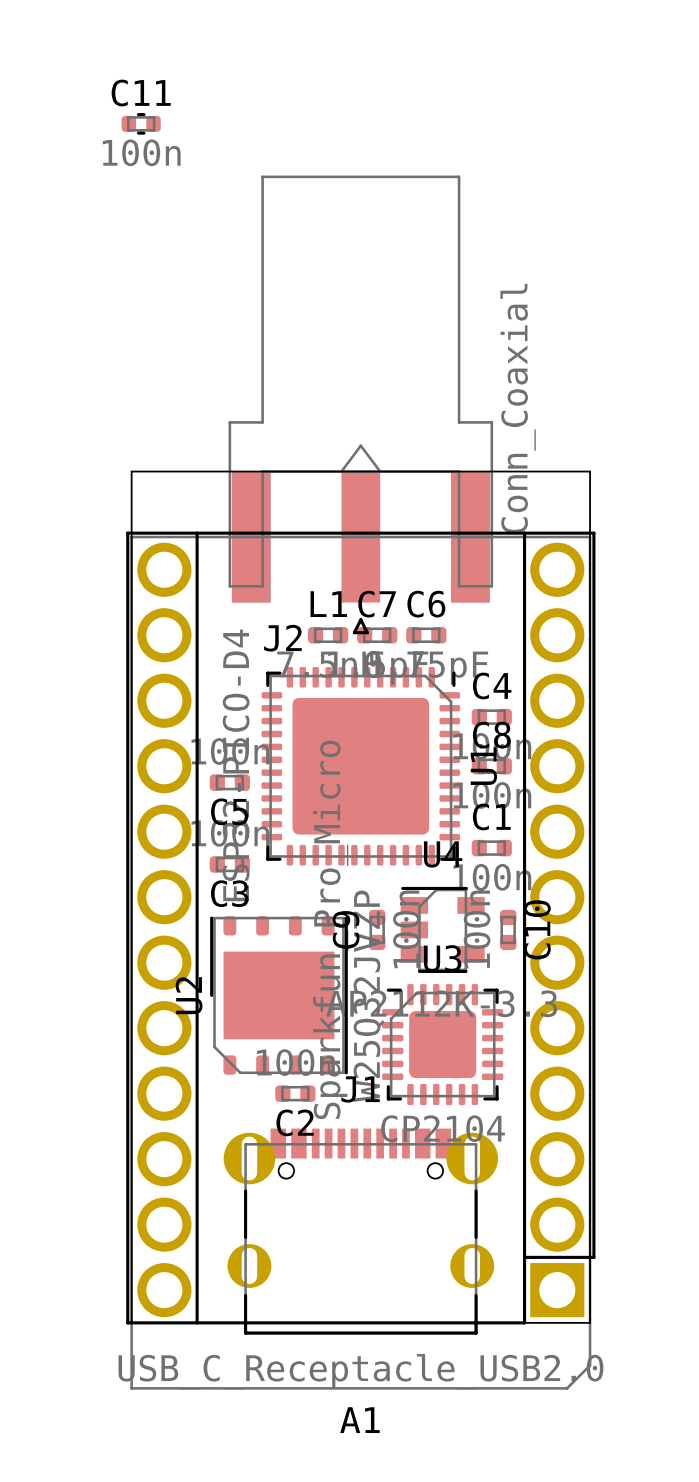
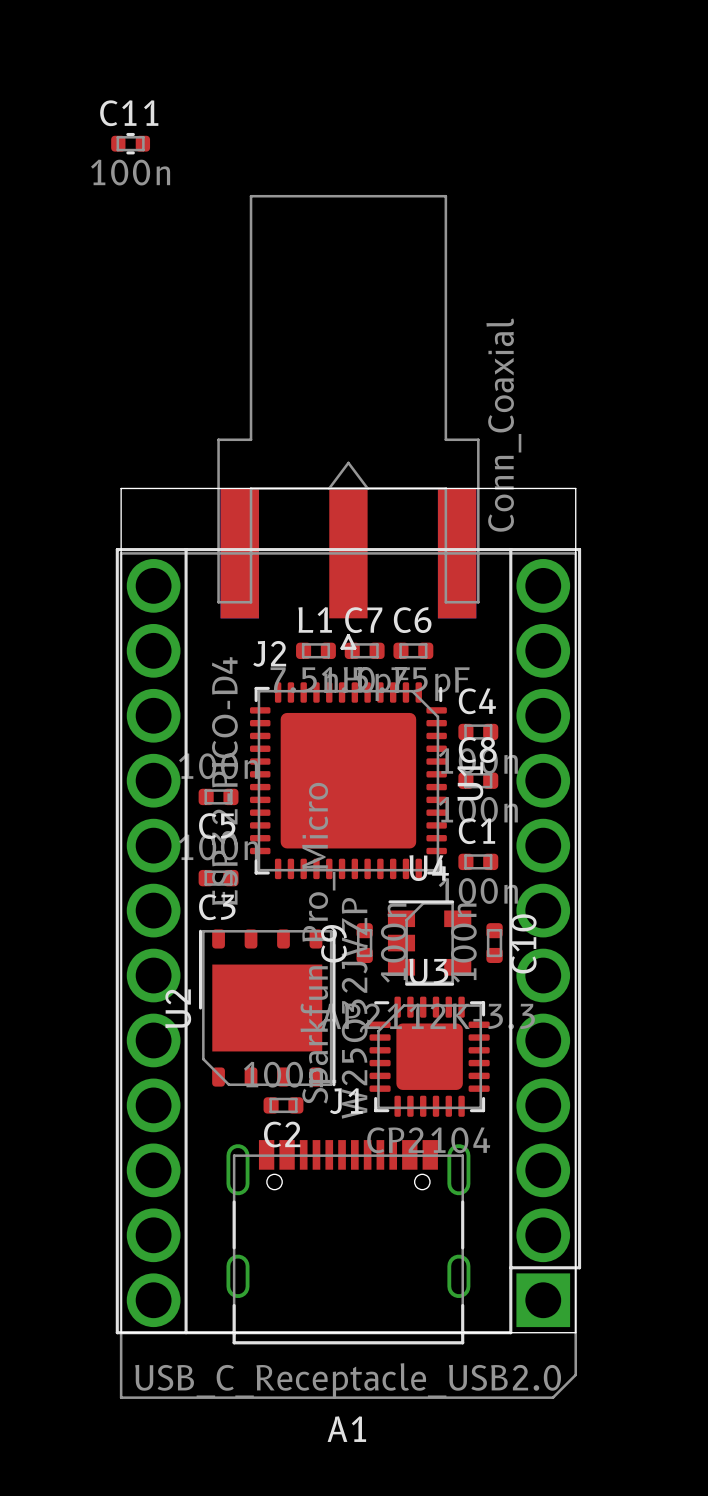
J1 footprint: [223, 1128, 498, 1335] -> [226, 1140, 471, 1345]

